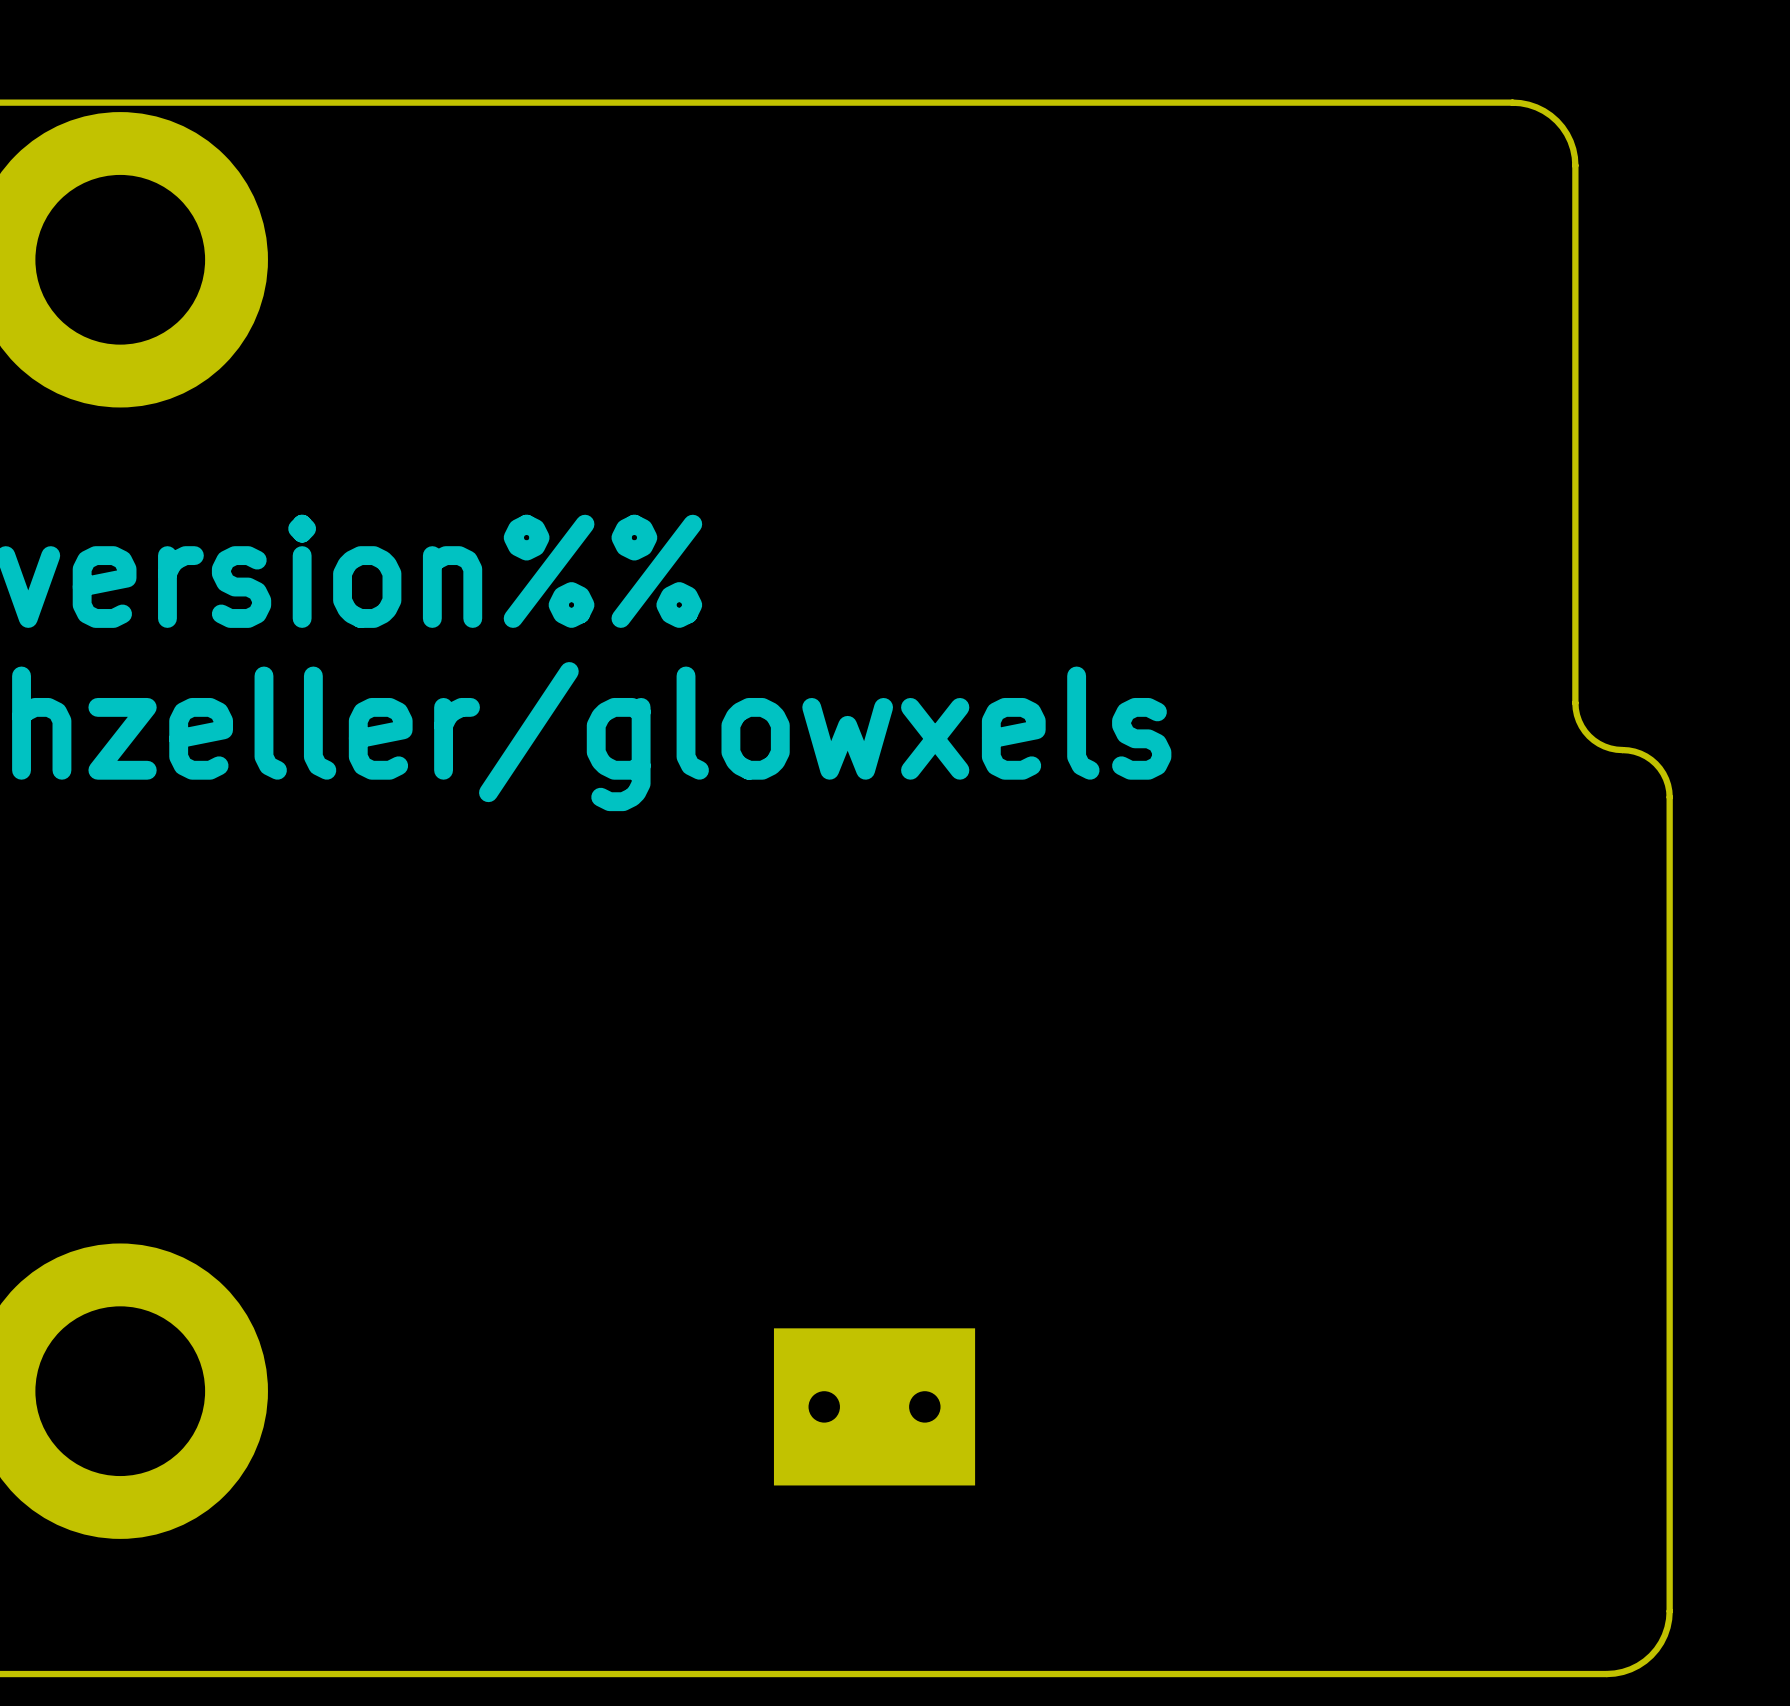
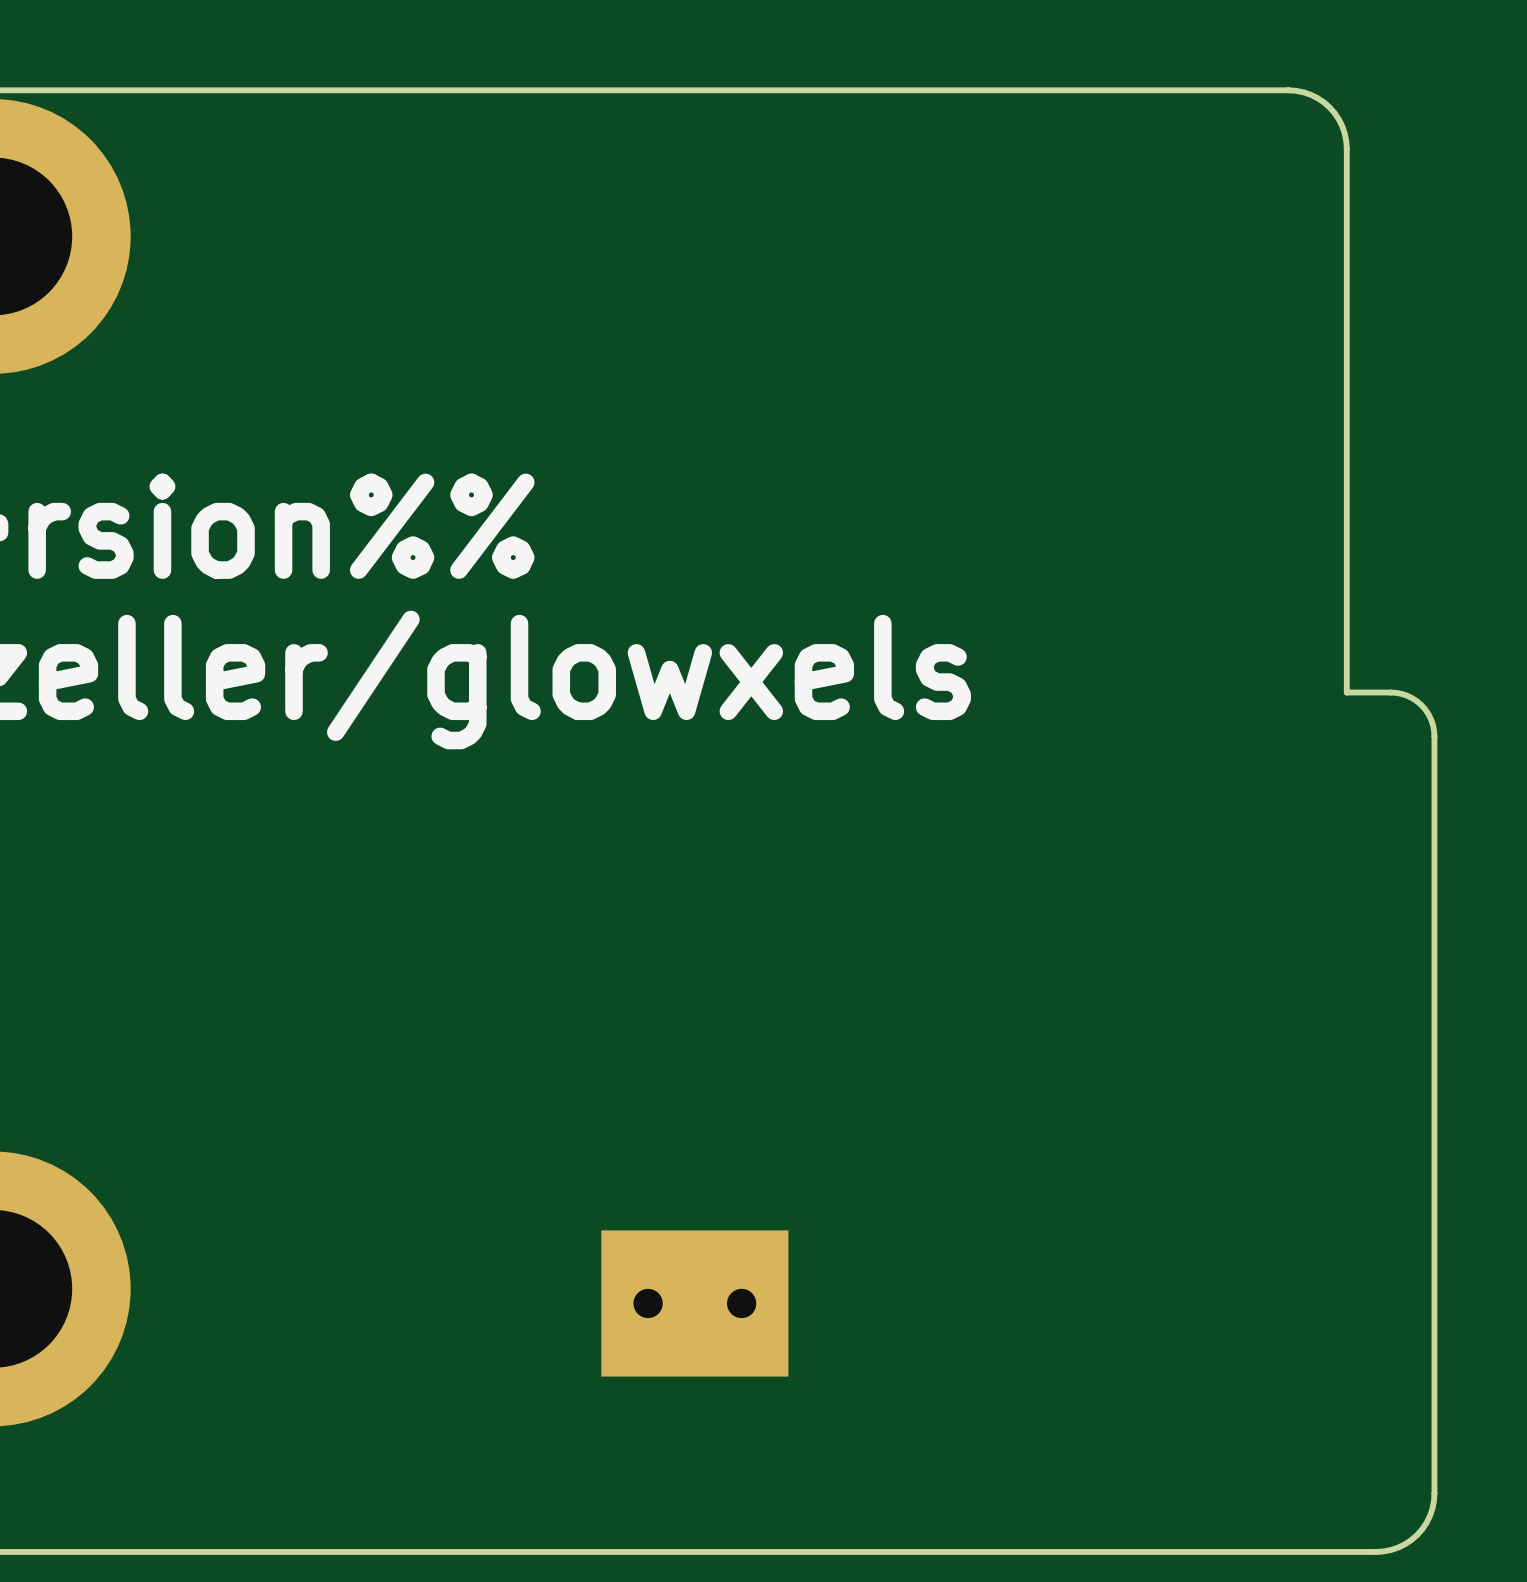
board edge: (1575, 702) (1578, 720) (1589, 736) (1604, 746) (1622, 750) -> (1346, 648) (1346, 692) (1390, 692)

